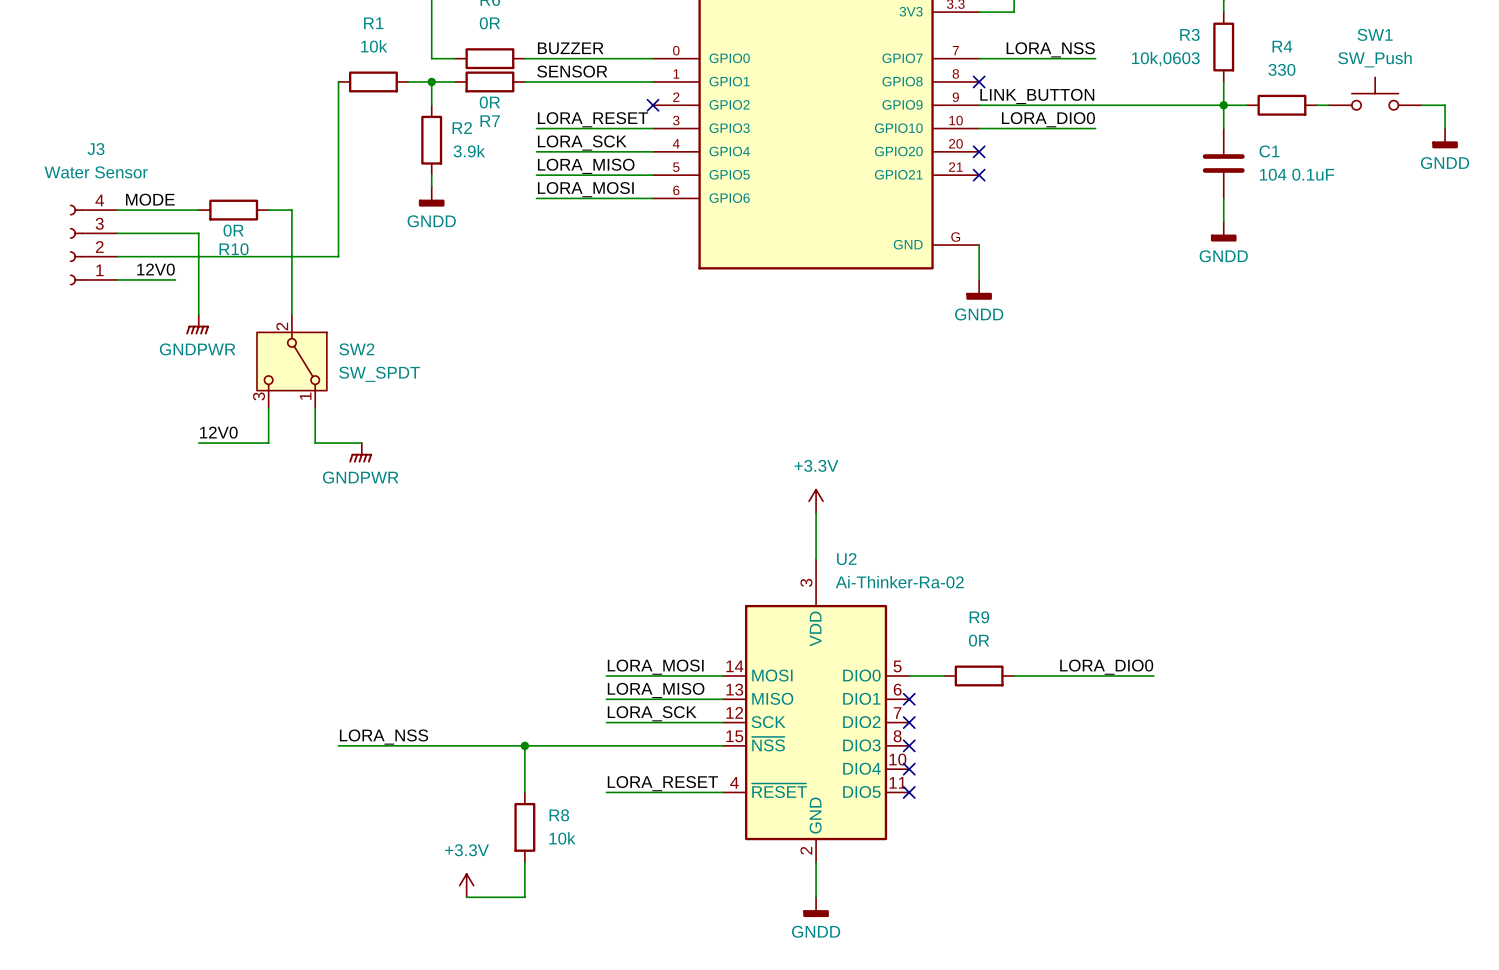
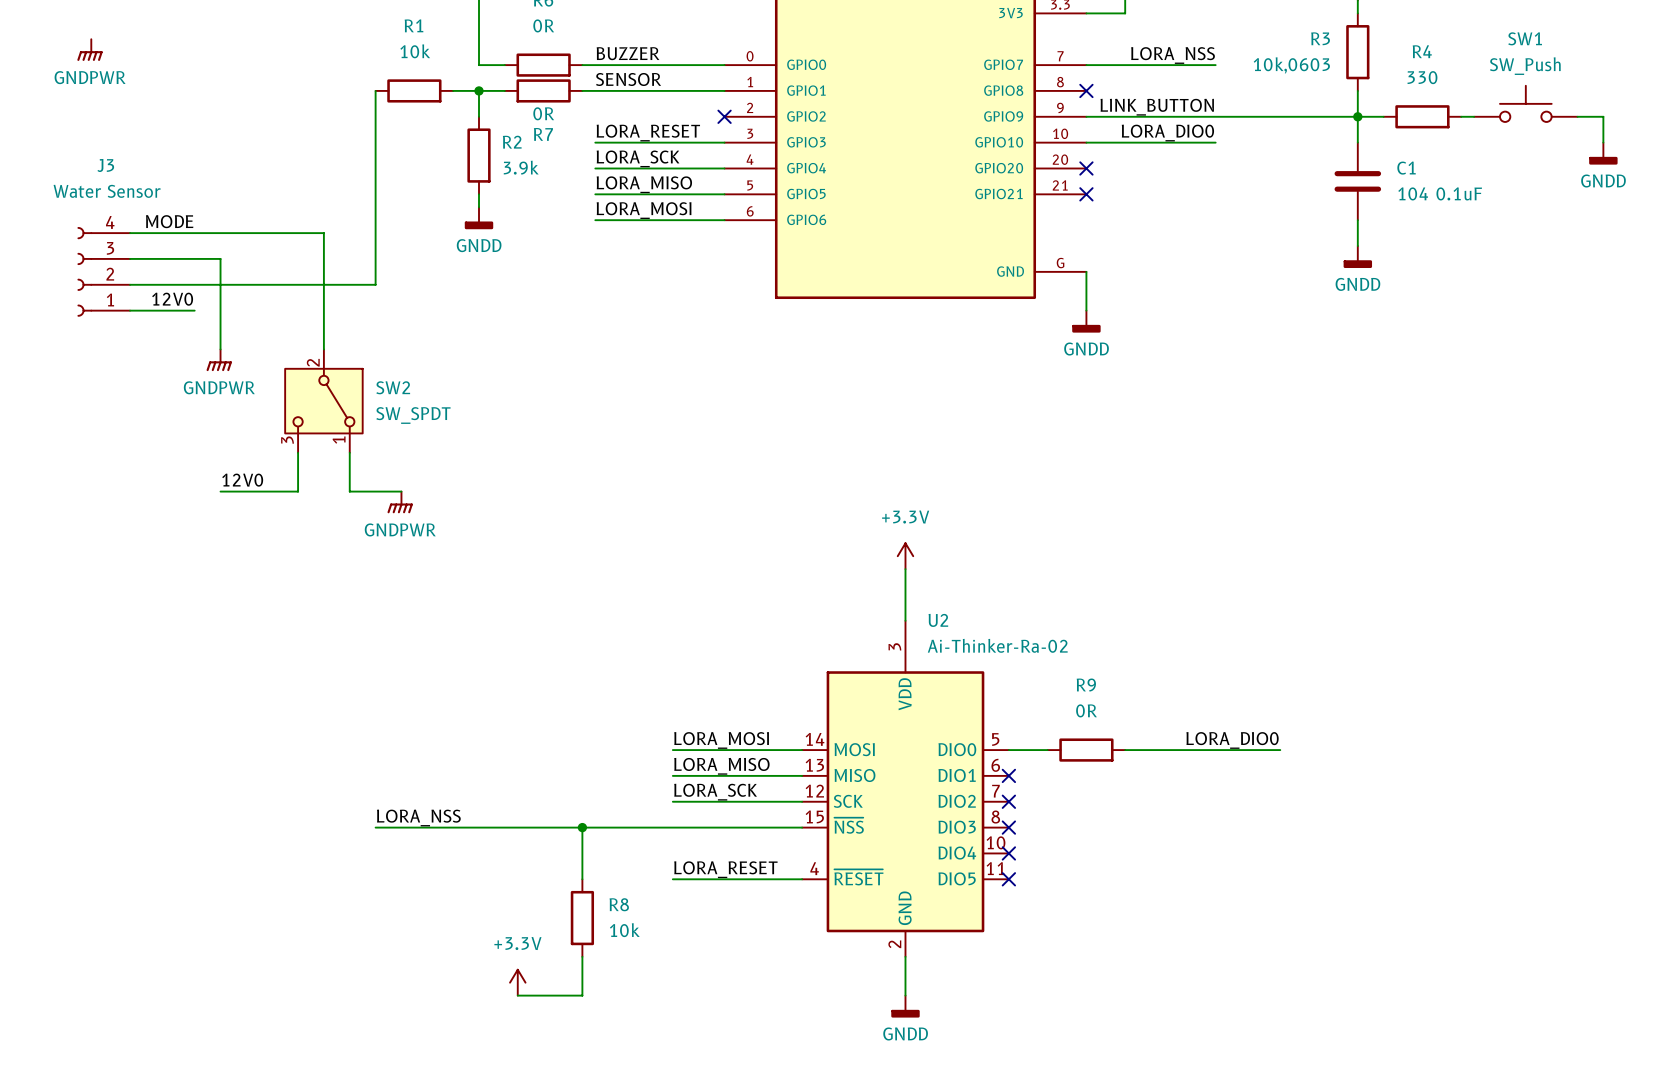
power symbol: none -> GNDPWR (89, 50)
wire: none -> (220, 233) (298, 233)
R10: 0R (233, 210) -> none

